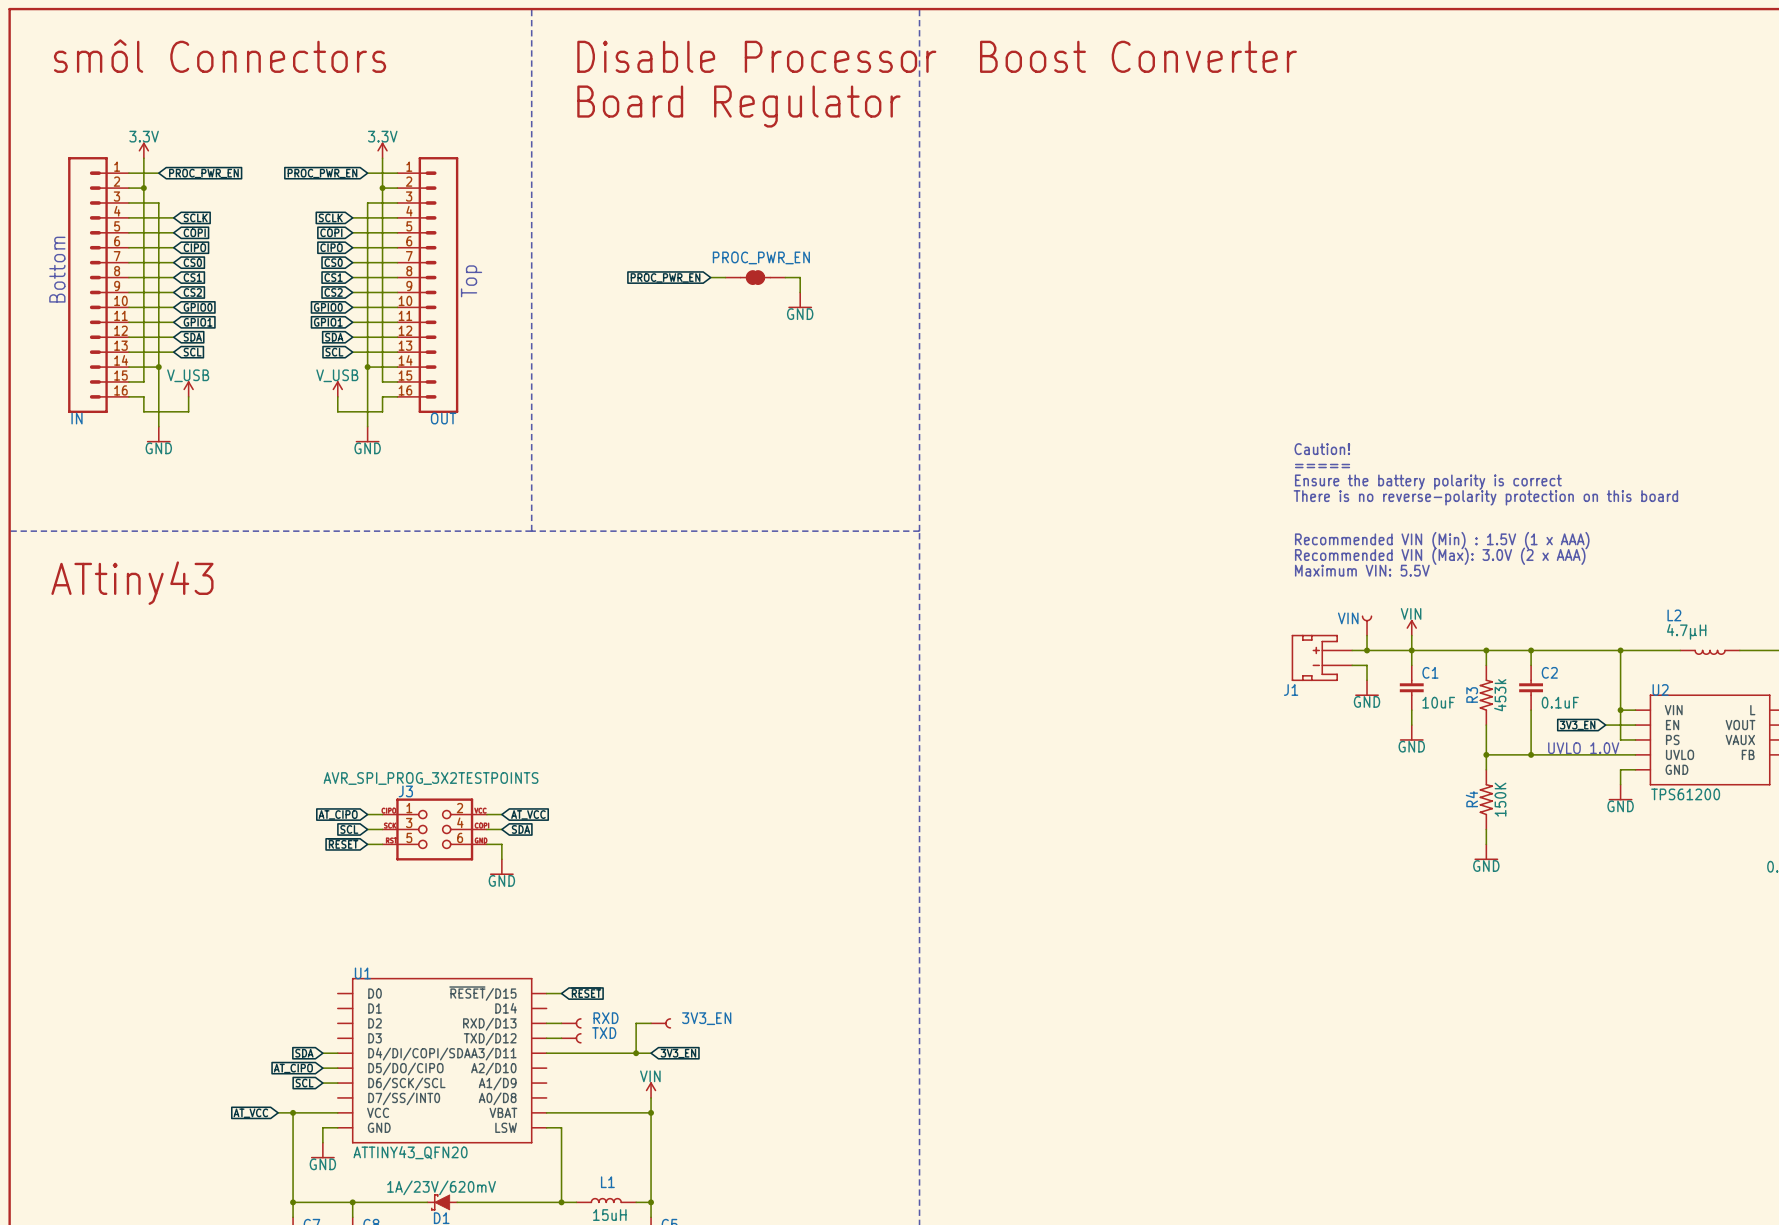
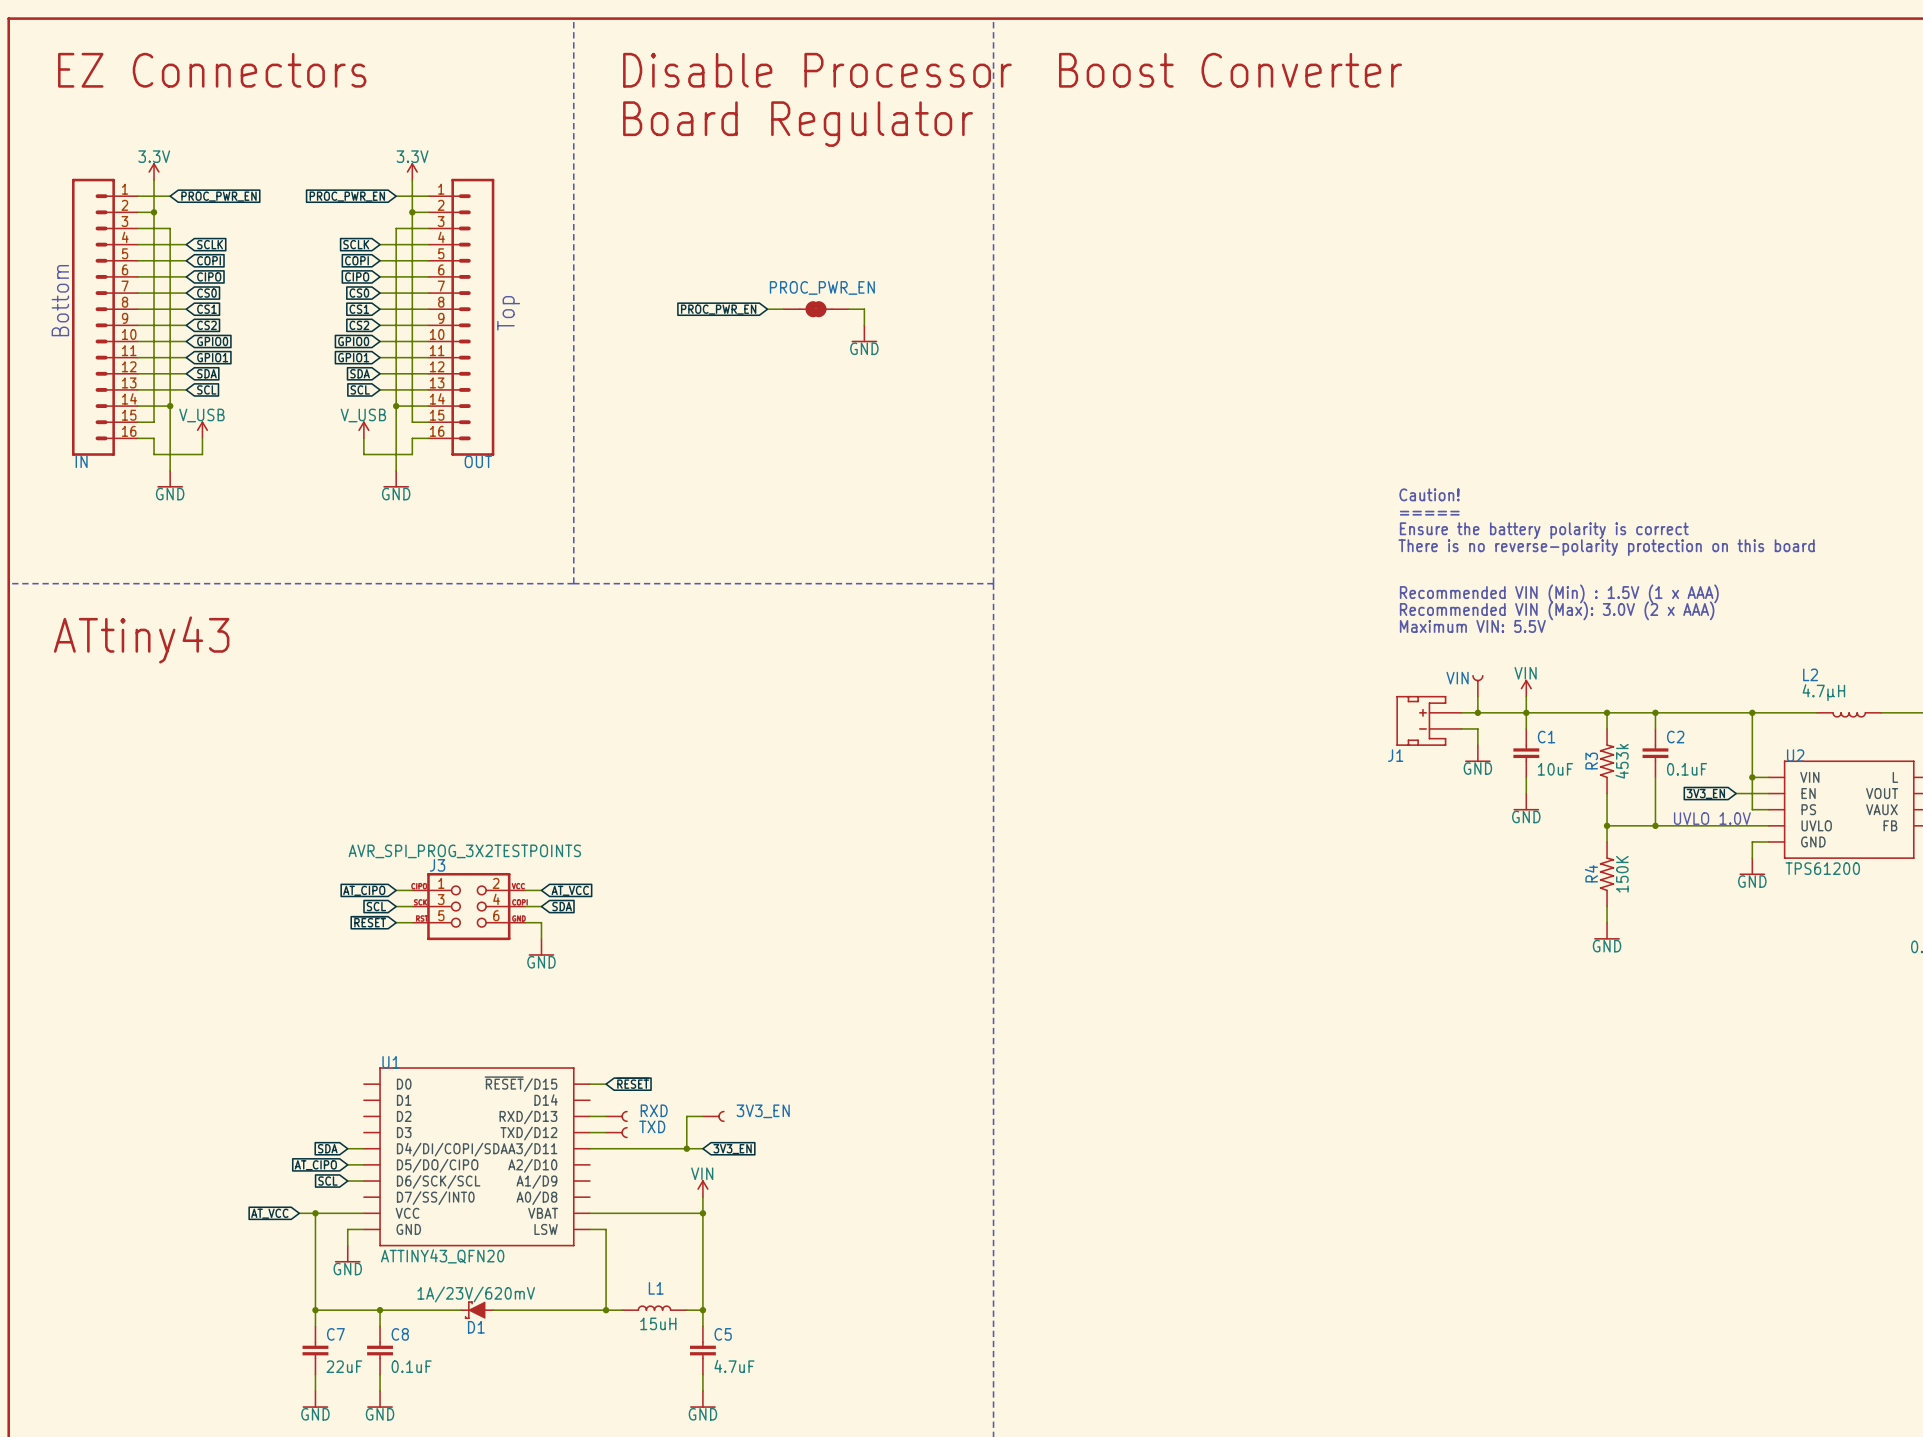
text: smôl Connectors (220, 56) -> EZ Connectors (212, 70)

